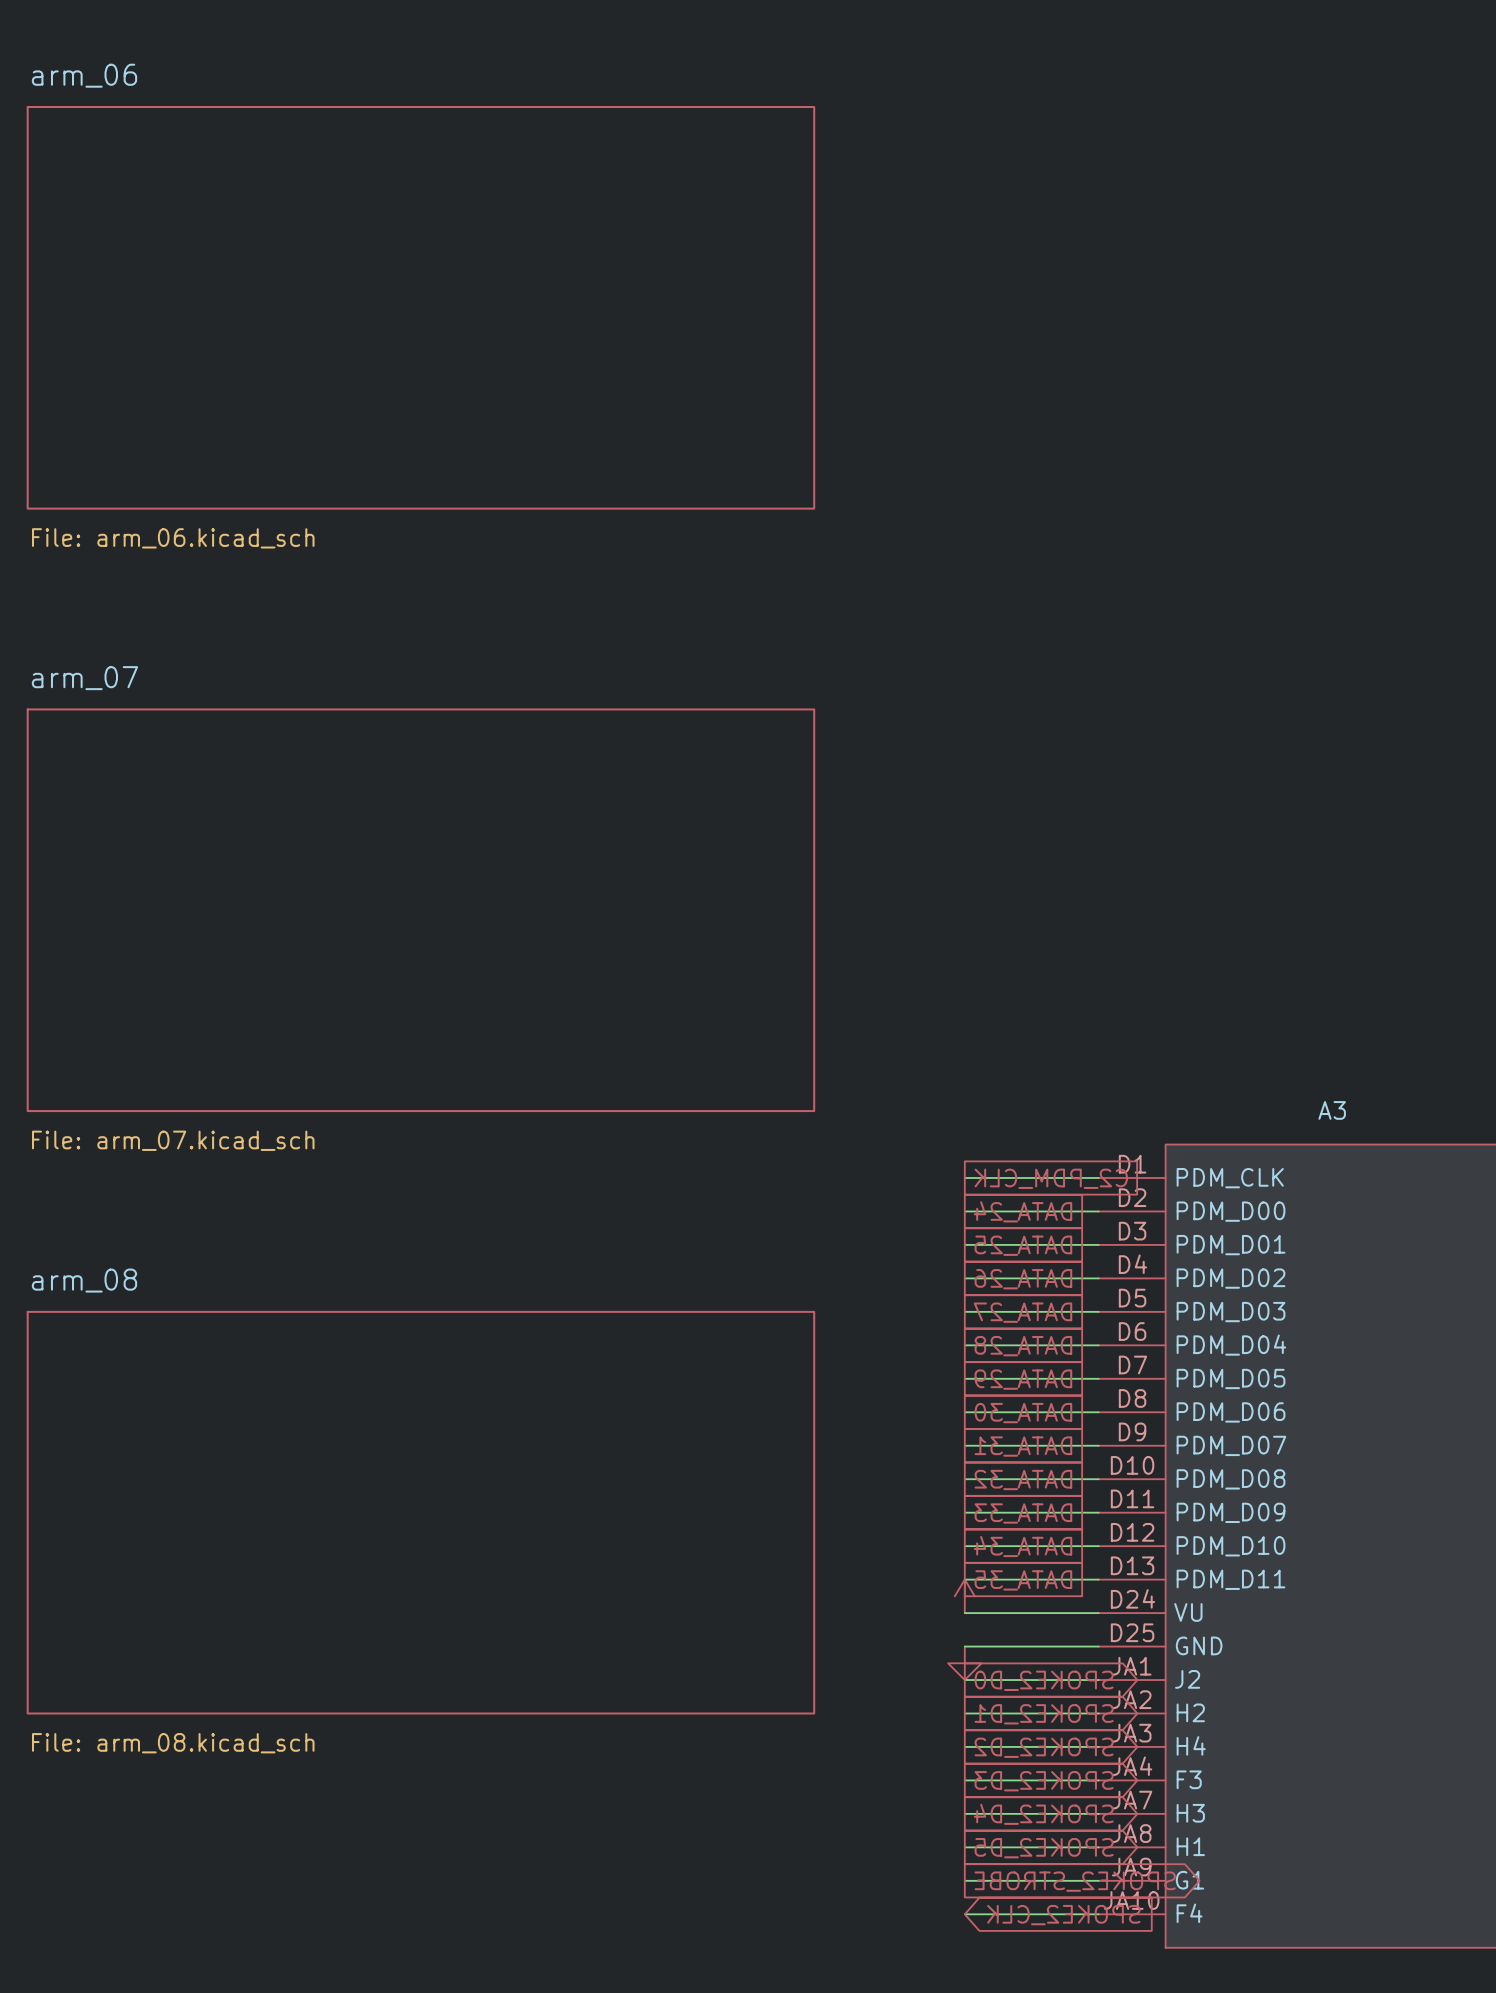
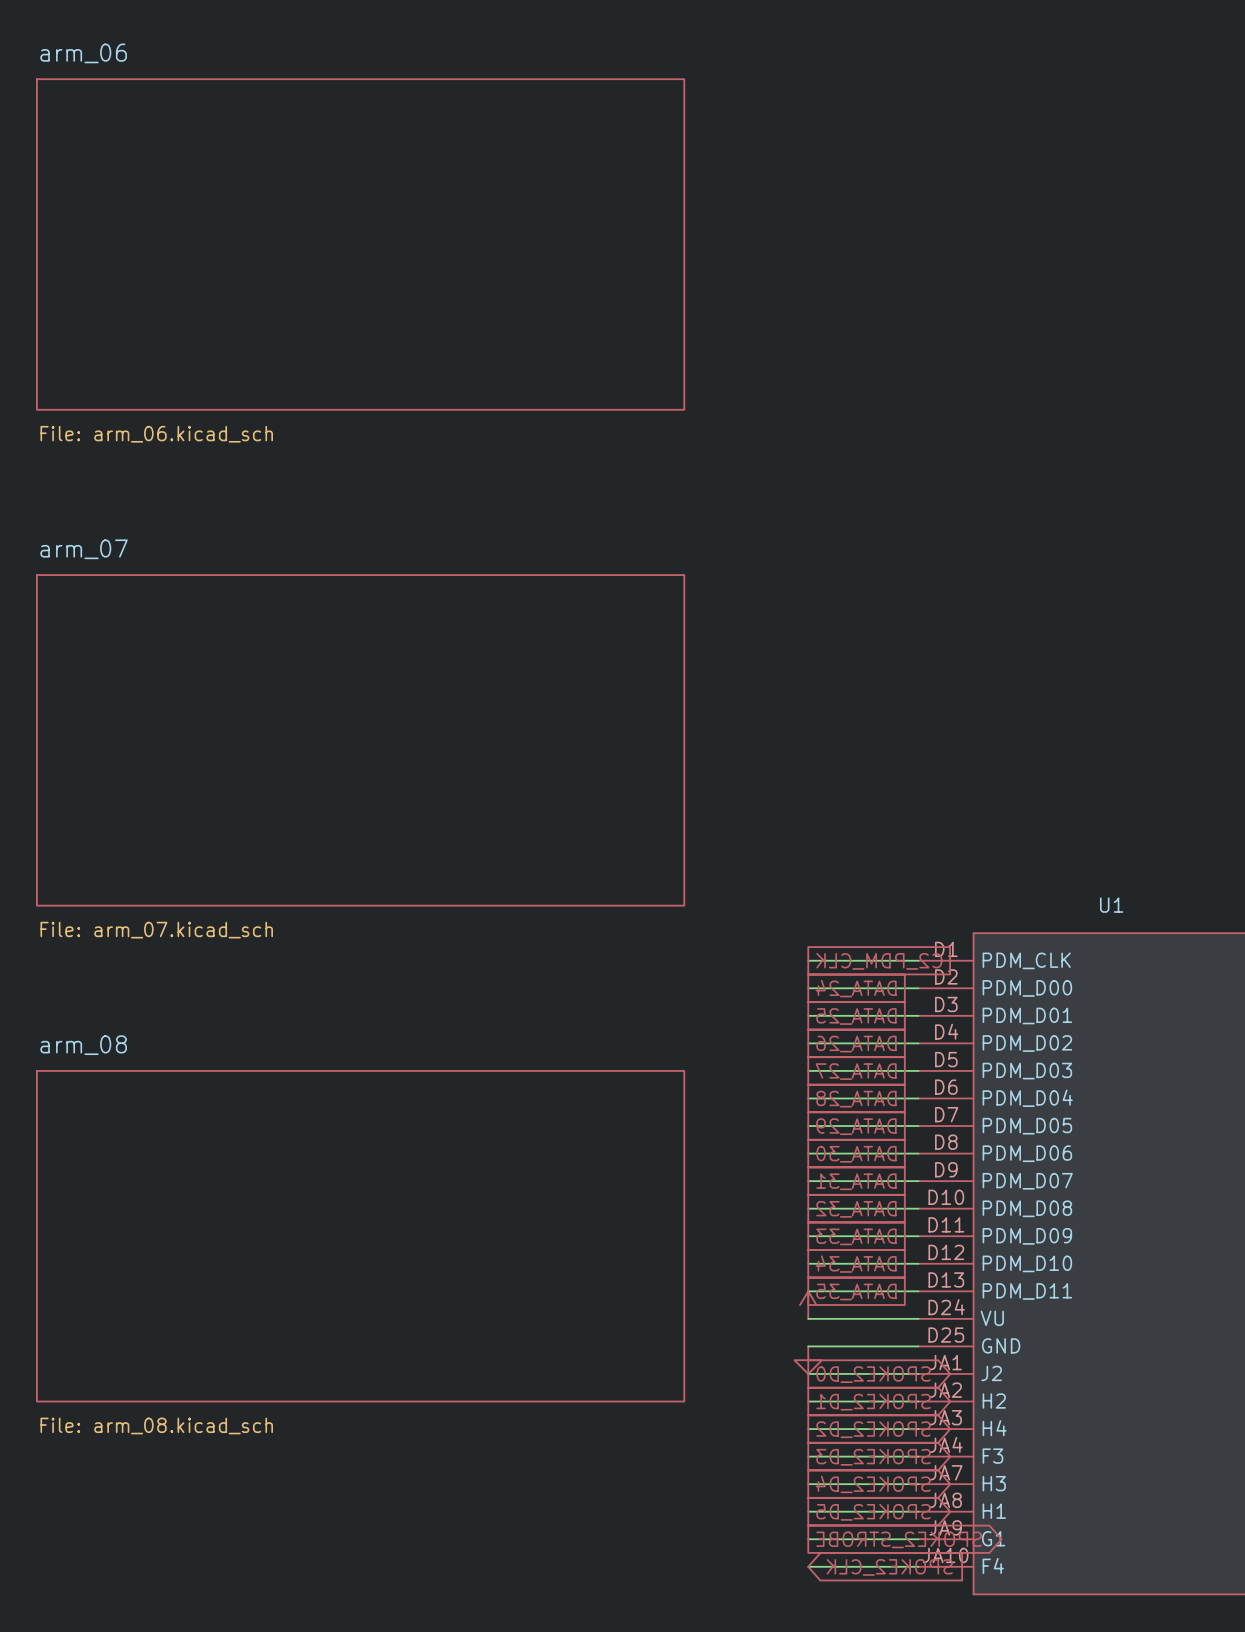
A3 name: A3 (1332, 1110) -> U1 (1111, 905)

